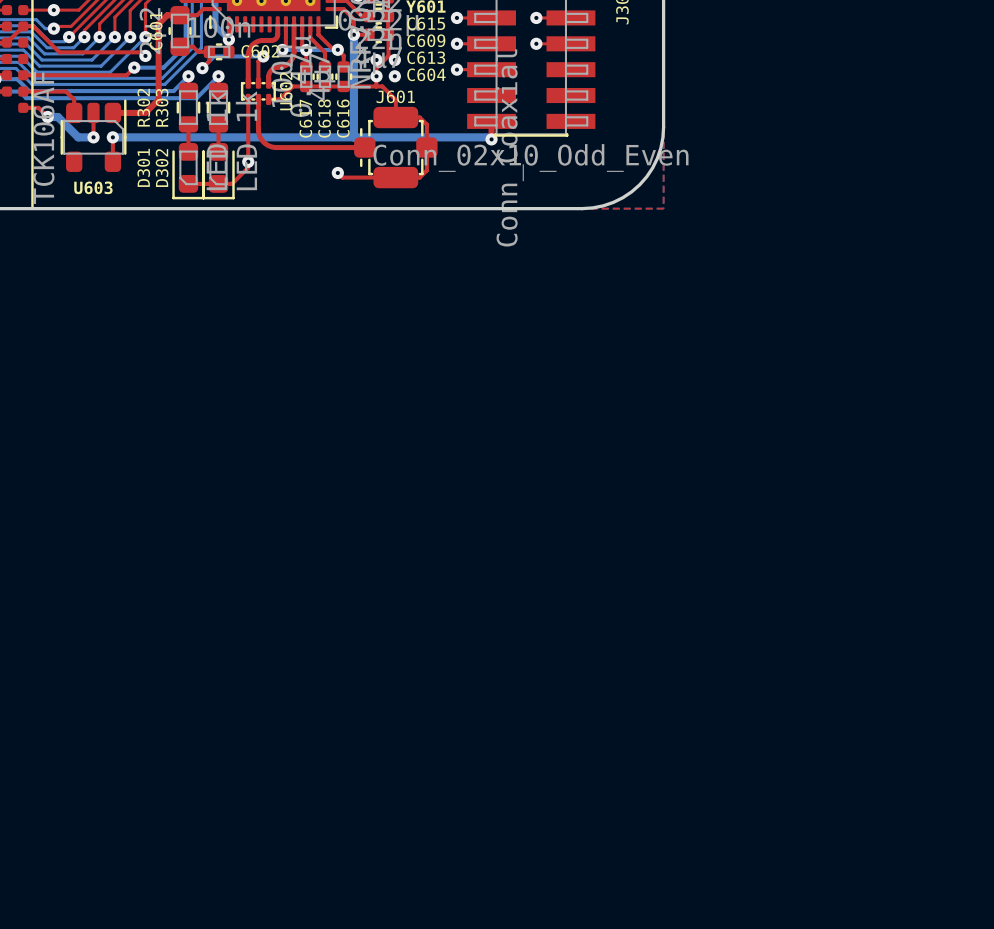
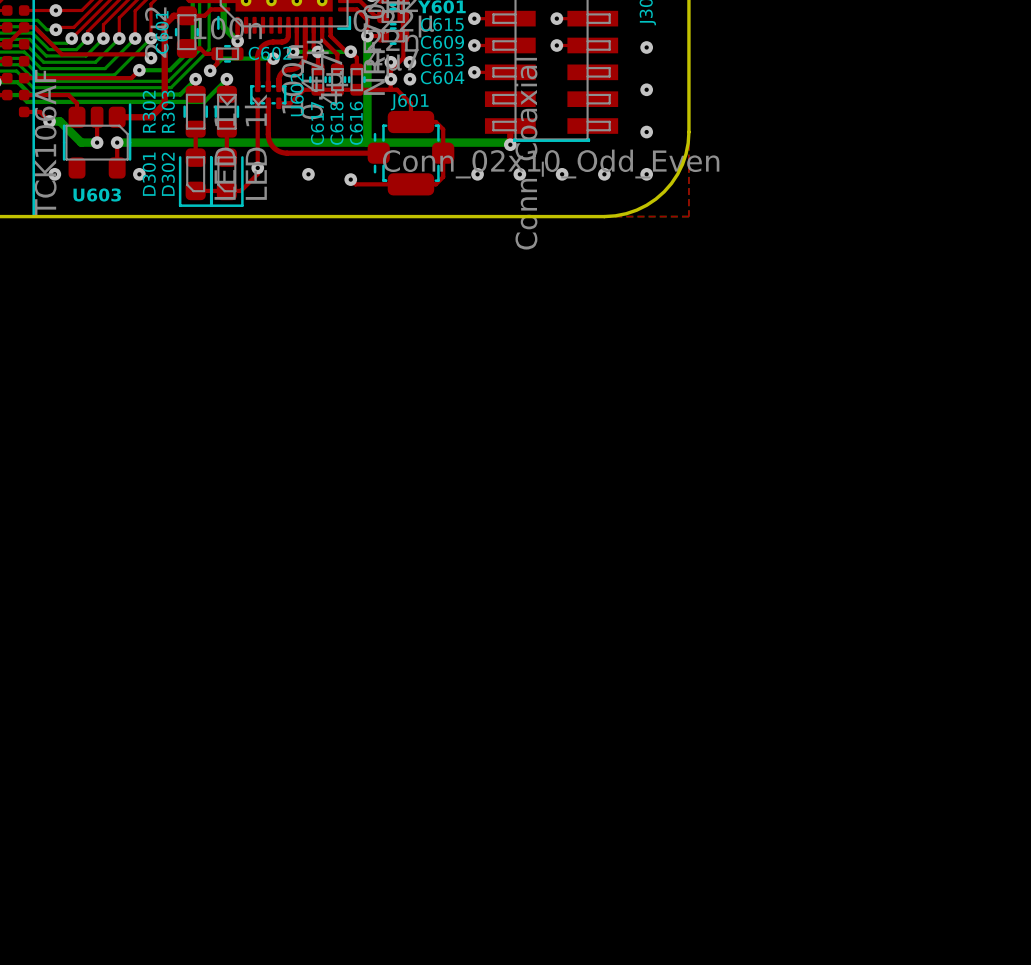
via: none -> (646, 47)
via: none -> (646, 89)
via: none -> (646, 132)
via: none -> (54, 174)
via: none -> (139, 174)
via: none -> (308, 174)
via: none -> (477, 174)
via: none -> (519, 174)
via: none -> (562, 174)
via: none -> (604, 174)
via: none -> (646, 174)

